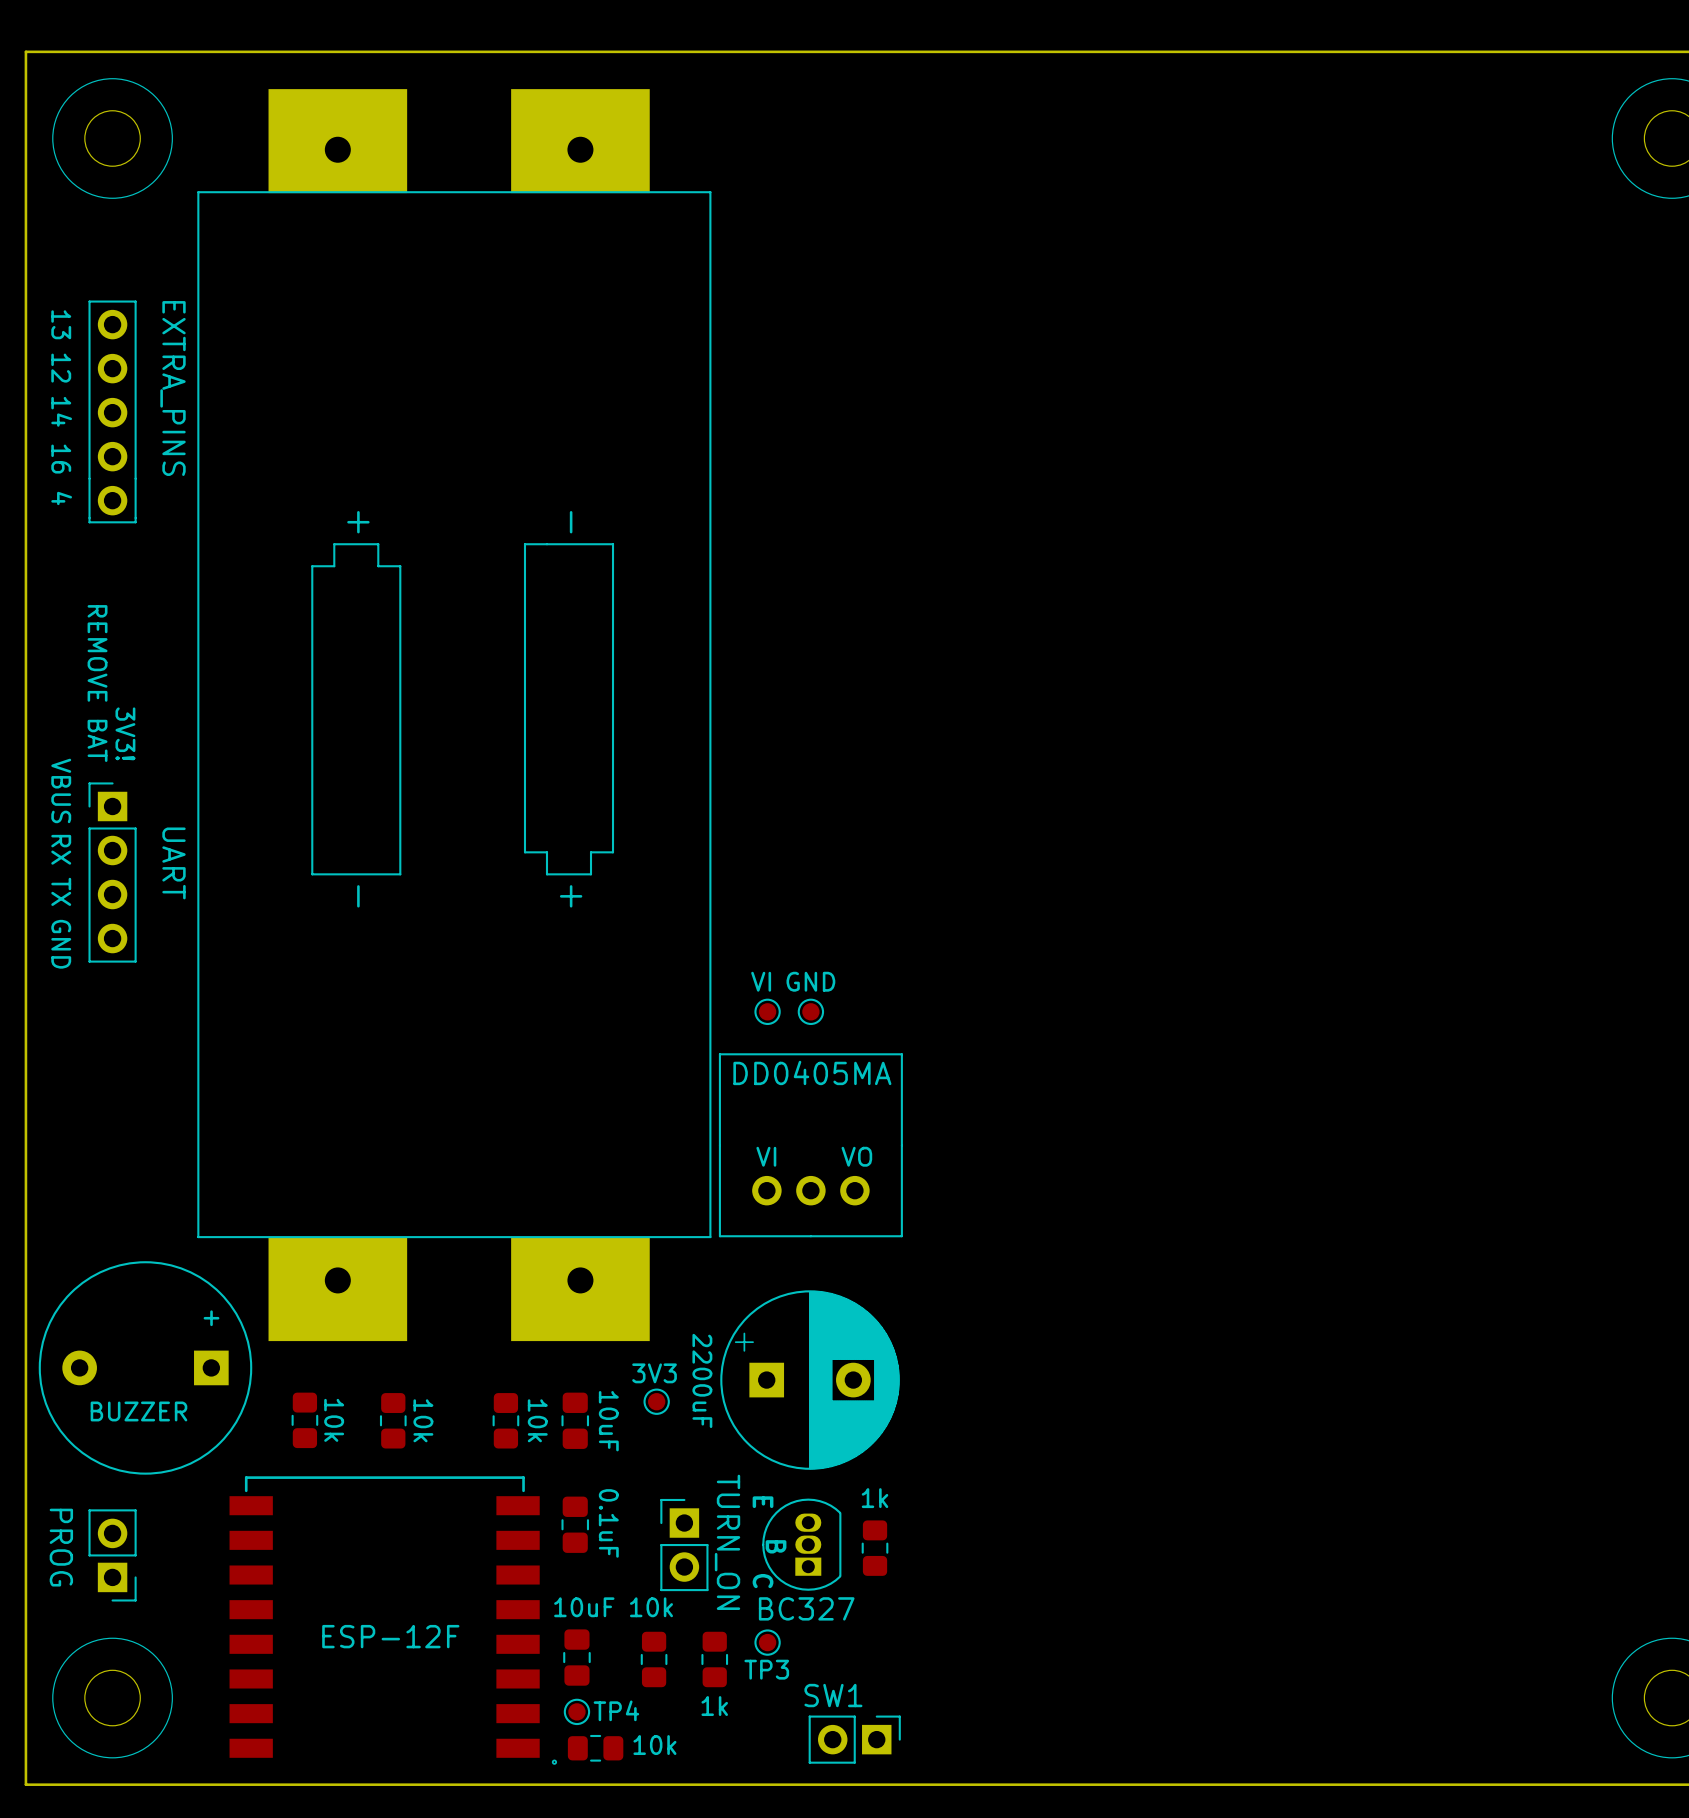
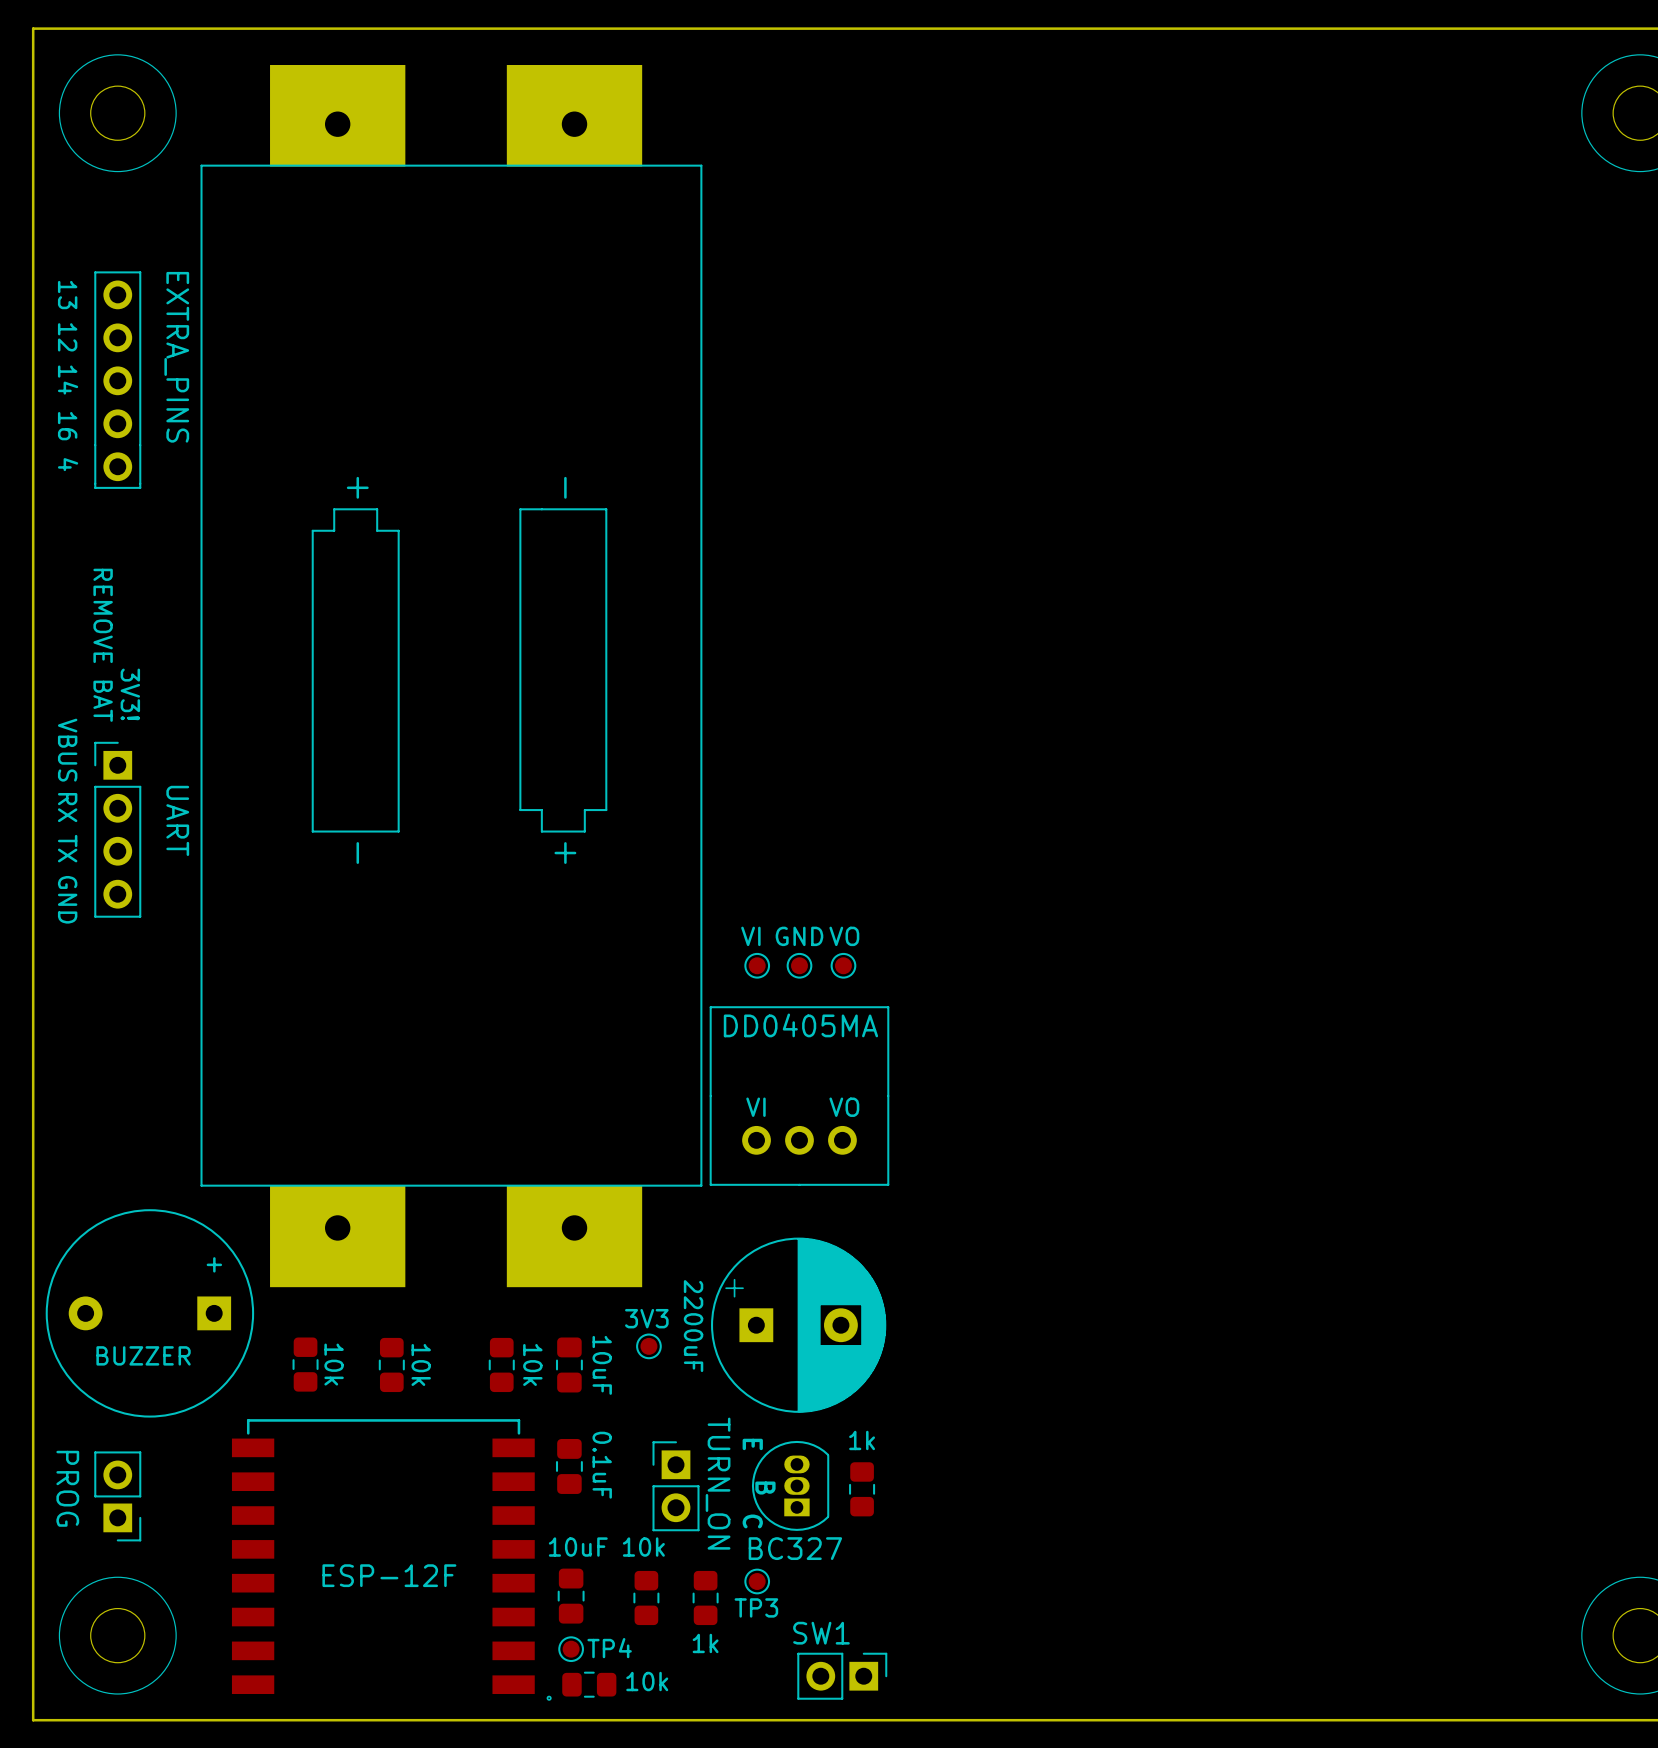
text: none -> VO (844, 936)
part: none -> (843, 965)

